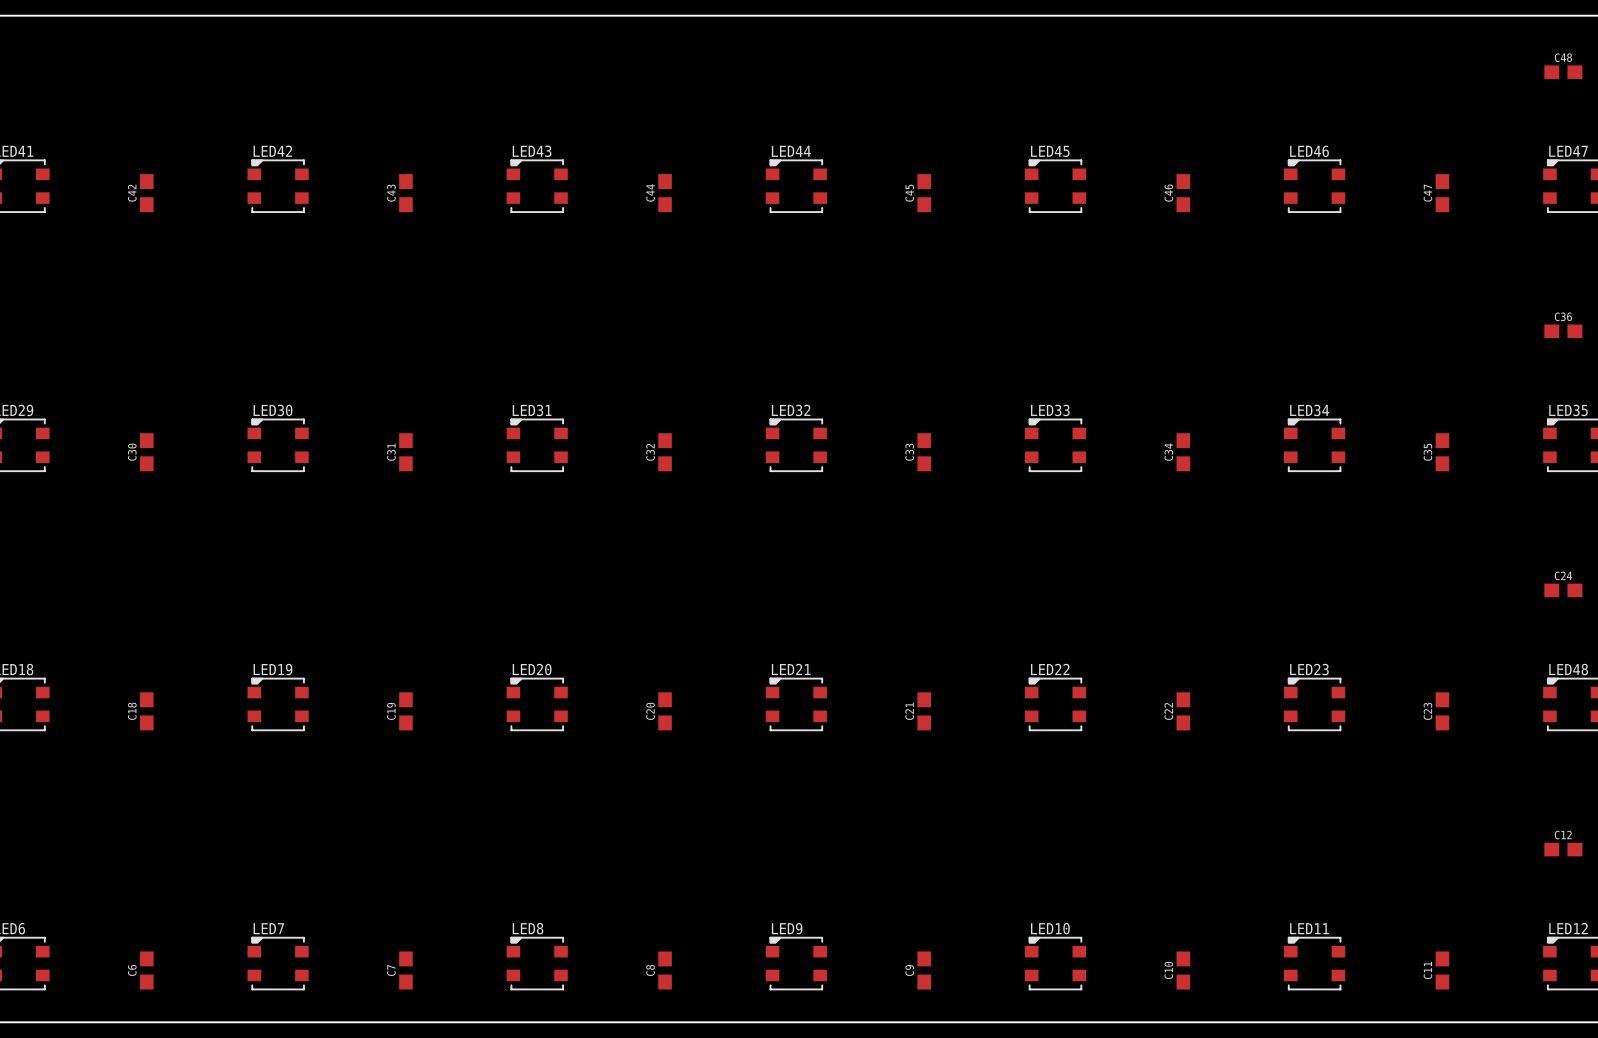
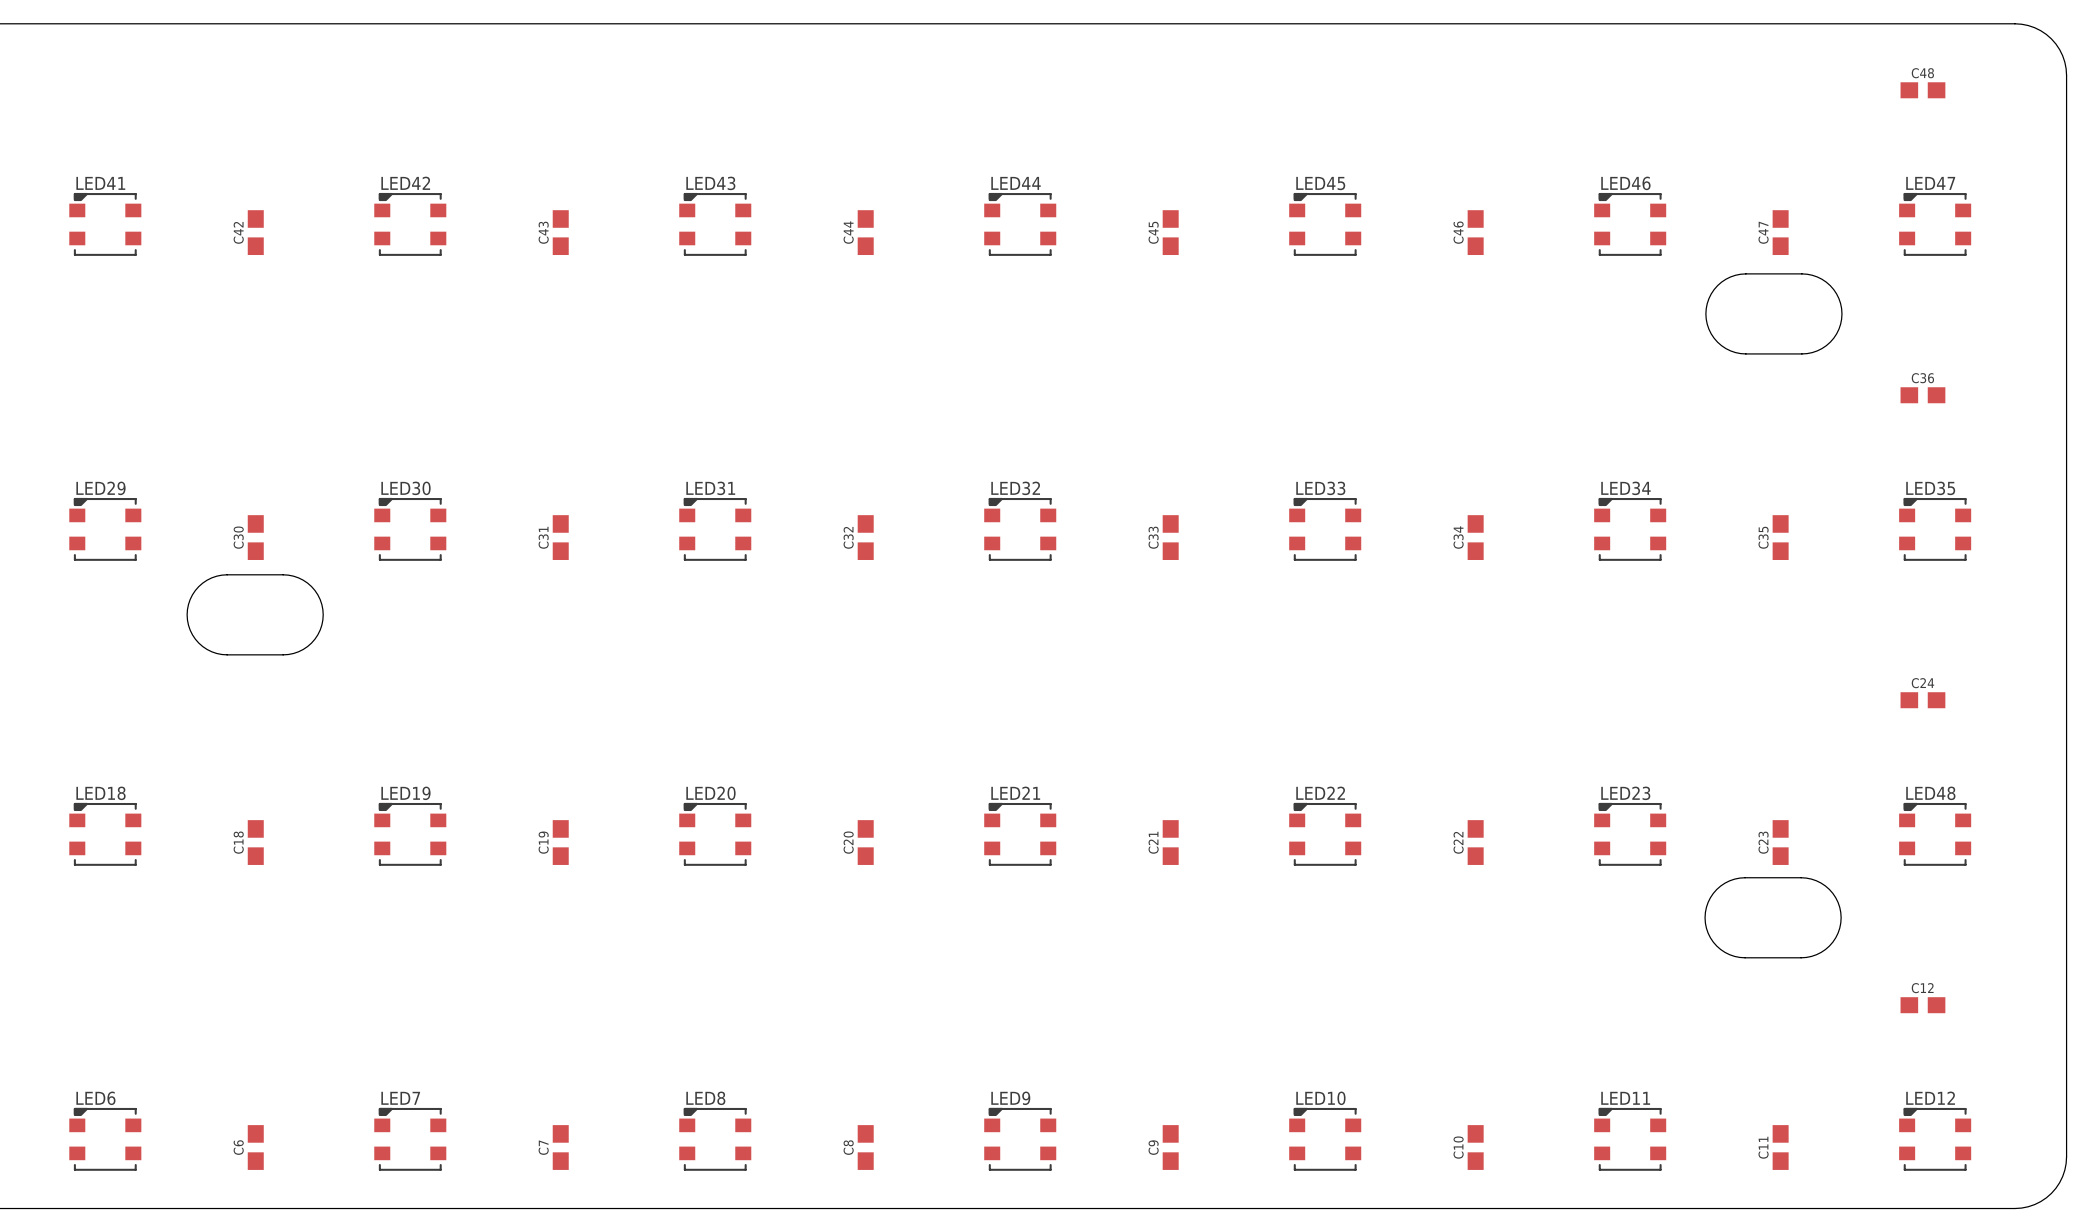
board edge: none -> (1745, 273) (1807, 274) (1826, 282) (1836, 293) (1841, 308) (1840, 324) (1833, 338) (1821, 348) (1807, 353) (1740, 353) (1721, 345) (1714, 338) (1707, 324) (1707, 303) (1714, 289) (1721, 282) (1730, 276) (1745, 273)
board edge: none -> (227, 574) (288, 575) (307, 583) (317, 594) (322, 609) (321, 625) (314, 639) (303, 649) (288, 654) (221, 654) (202, 646) (195, 639) (188, 625) (188, 604) (195, 590) (202, 583) (211, 577) (227, 574)
board edge: none -> (1745, 877) (1806, 878) (1825, 886) (1835, 897) (1840, 912) (1839, 928) (1832, 942) (1821, 952) (1806, 957) (1739, 957) (1720, 949) (1713, 942) (1706, 928) (1706, 907) (1713, 893) (1720, 886) (1734, 879) (1745, 877)

